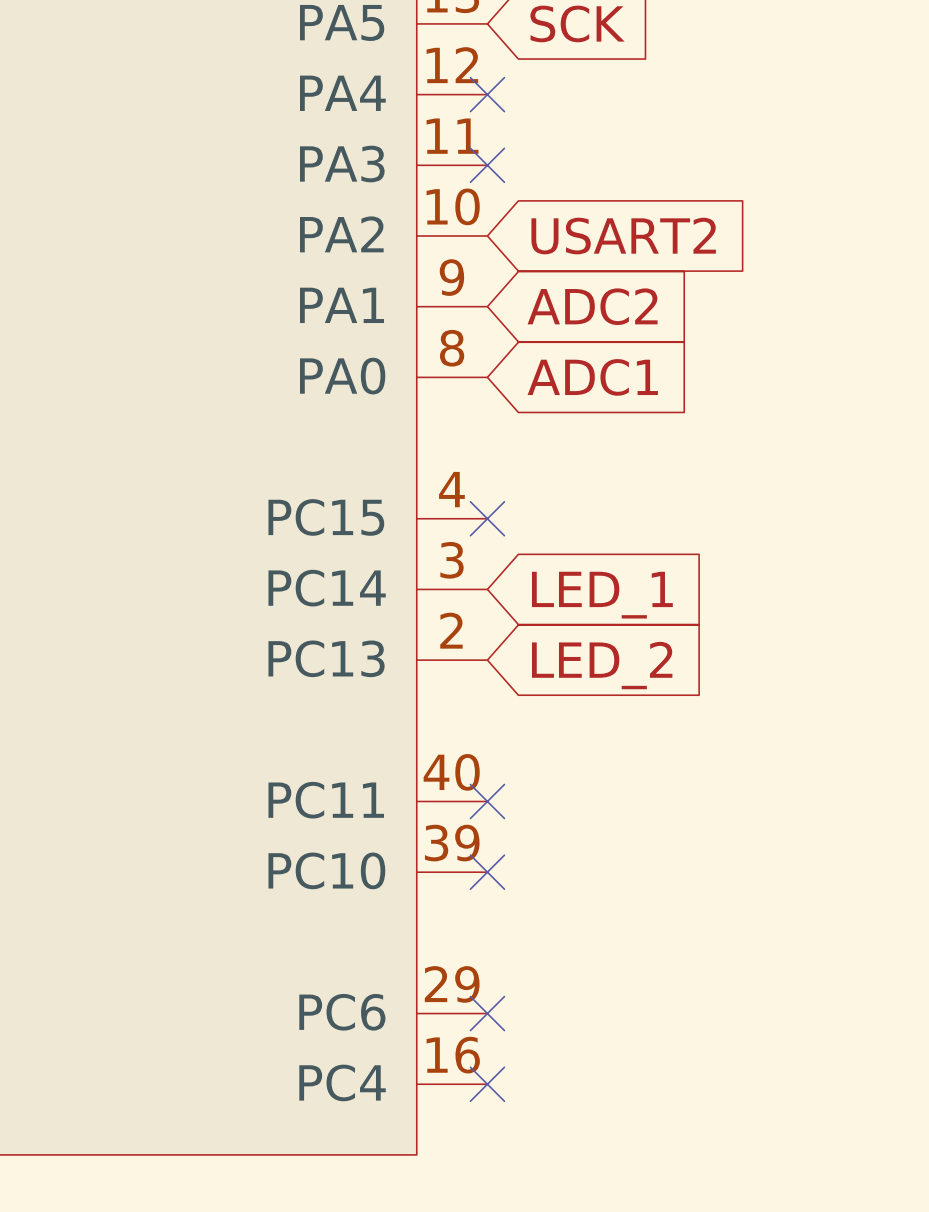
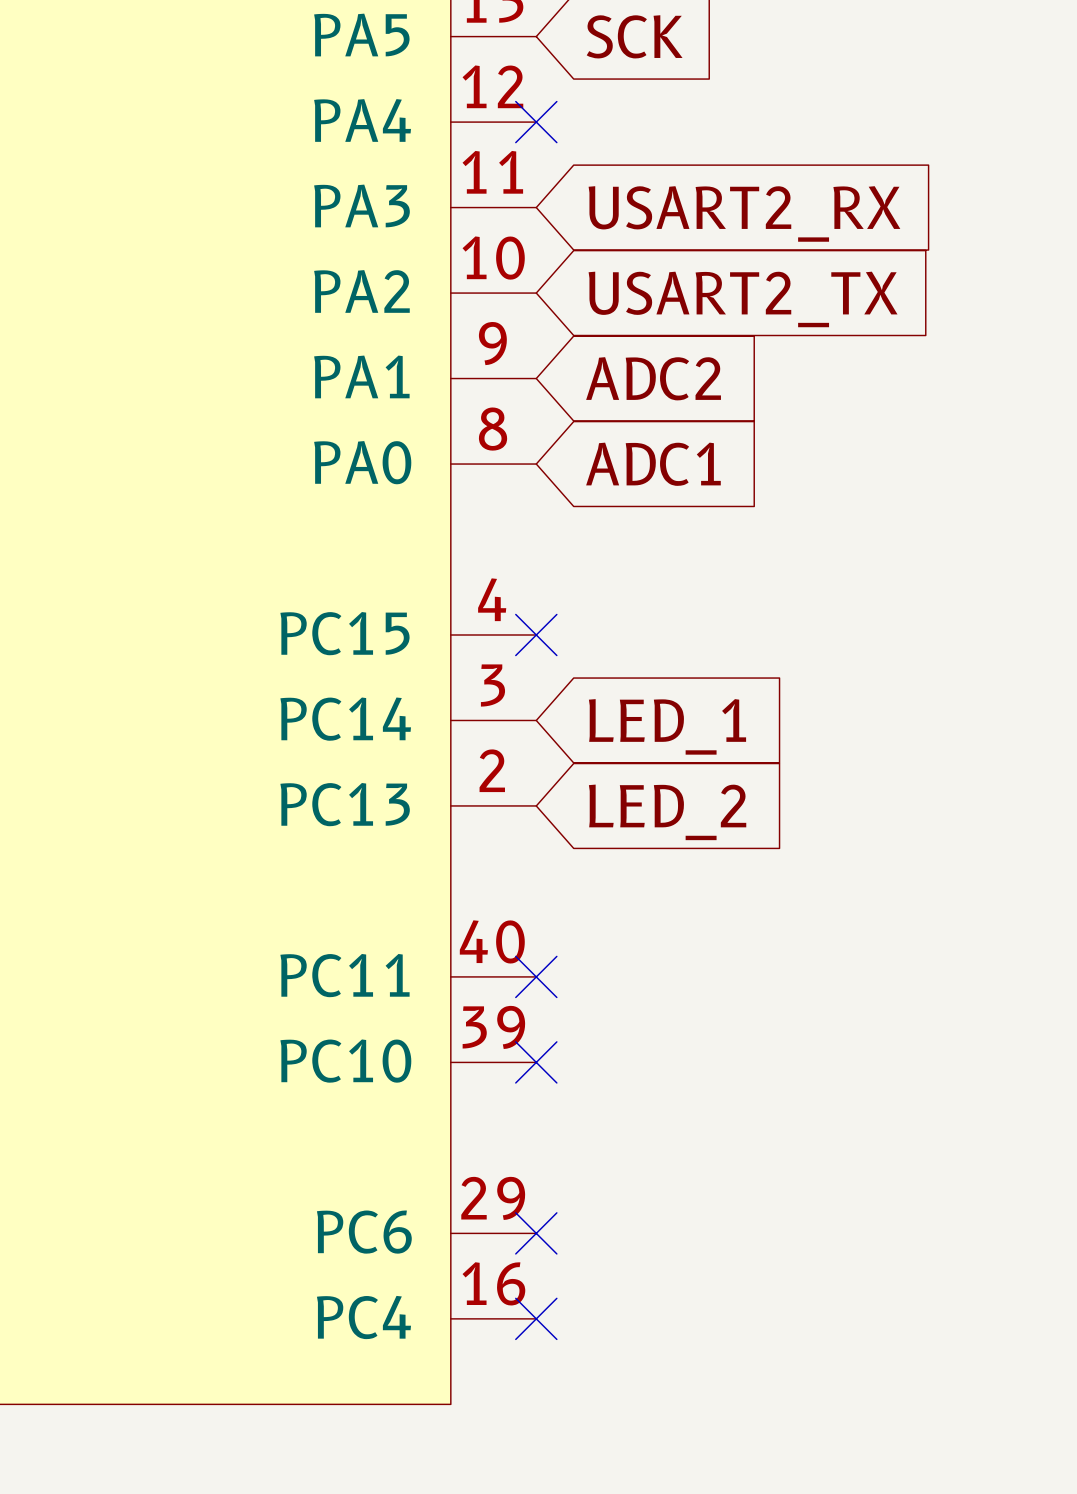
no-connect mark: (487, 165) -> none
global label: none -> USART2_RX (744, 213)
global label: USART2 (623, 236) -> USART2_TX (743, 299)

